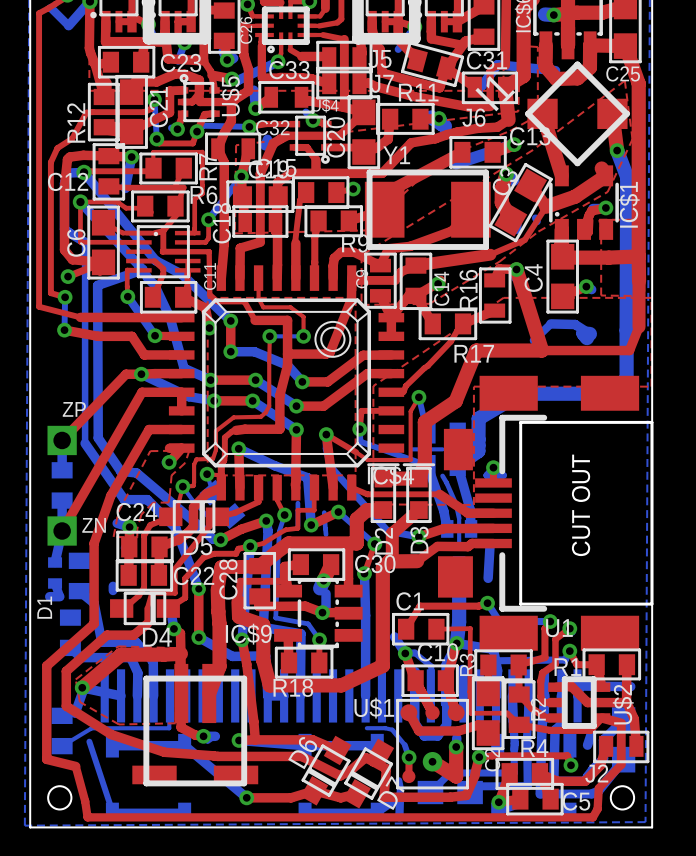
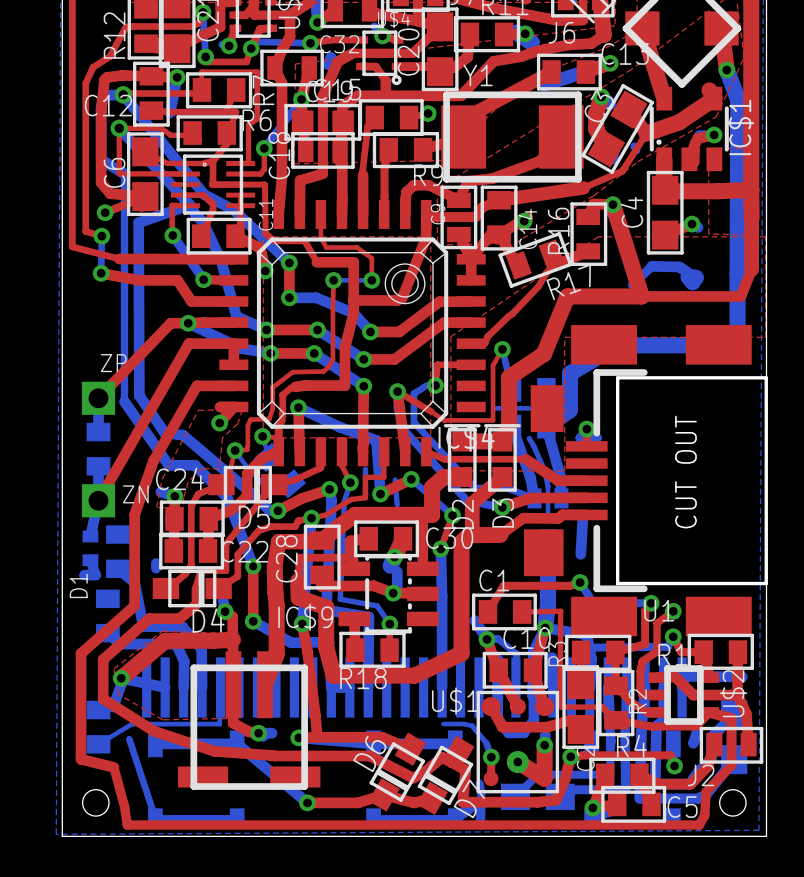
R17 rotation: 0° (447, 324) -> 20° counterclockwise (535, 259)
bottom track: none -> (426, 385) (414, 393) (414, 422) (474, 488) (506, 488) (534, 498)
bottom track: (359, 429) (360, 441) (427, 465) -> none

